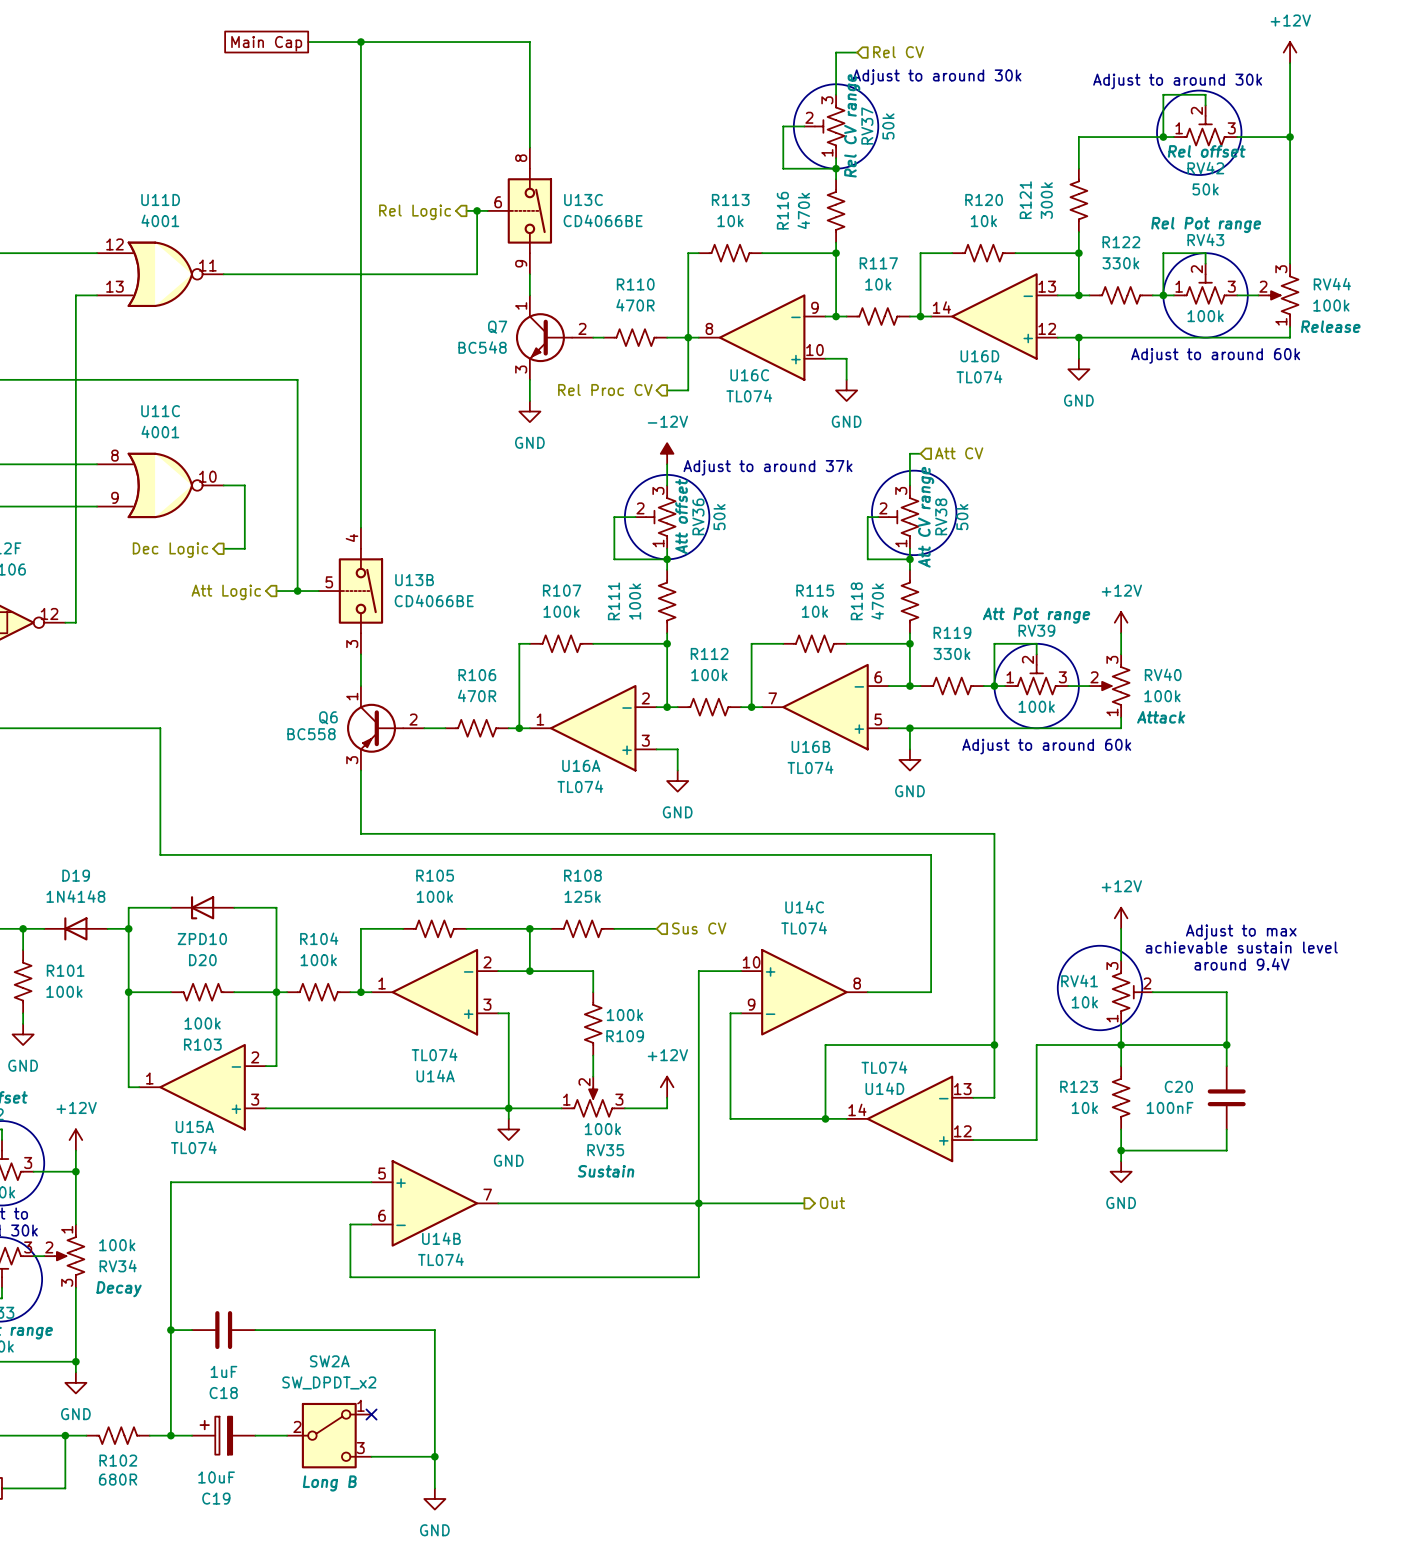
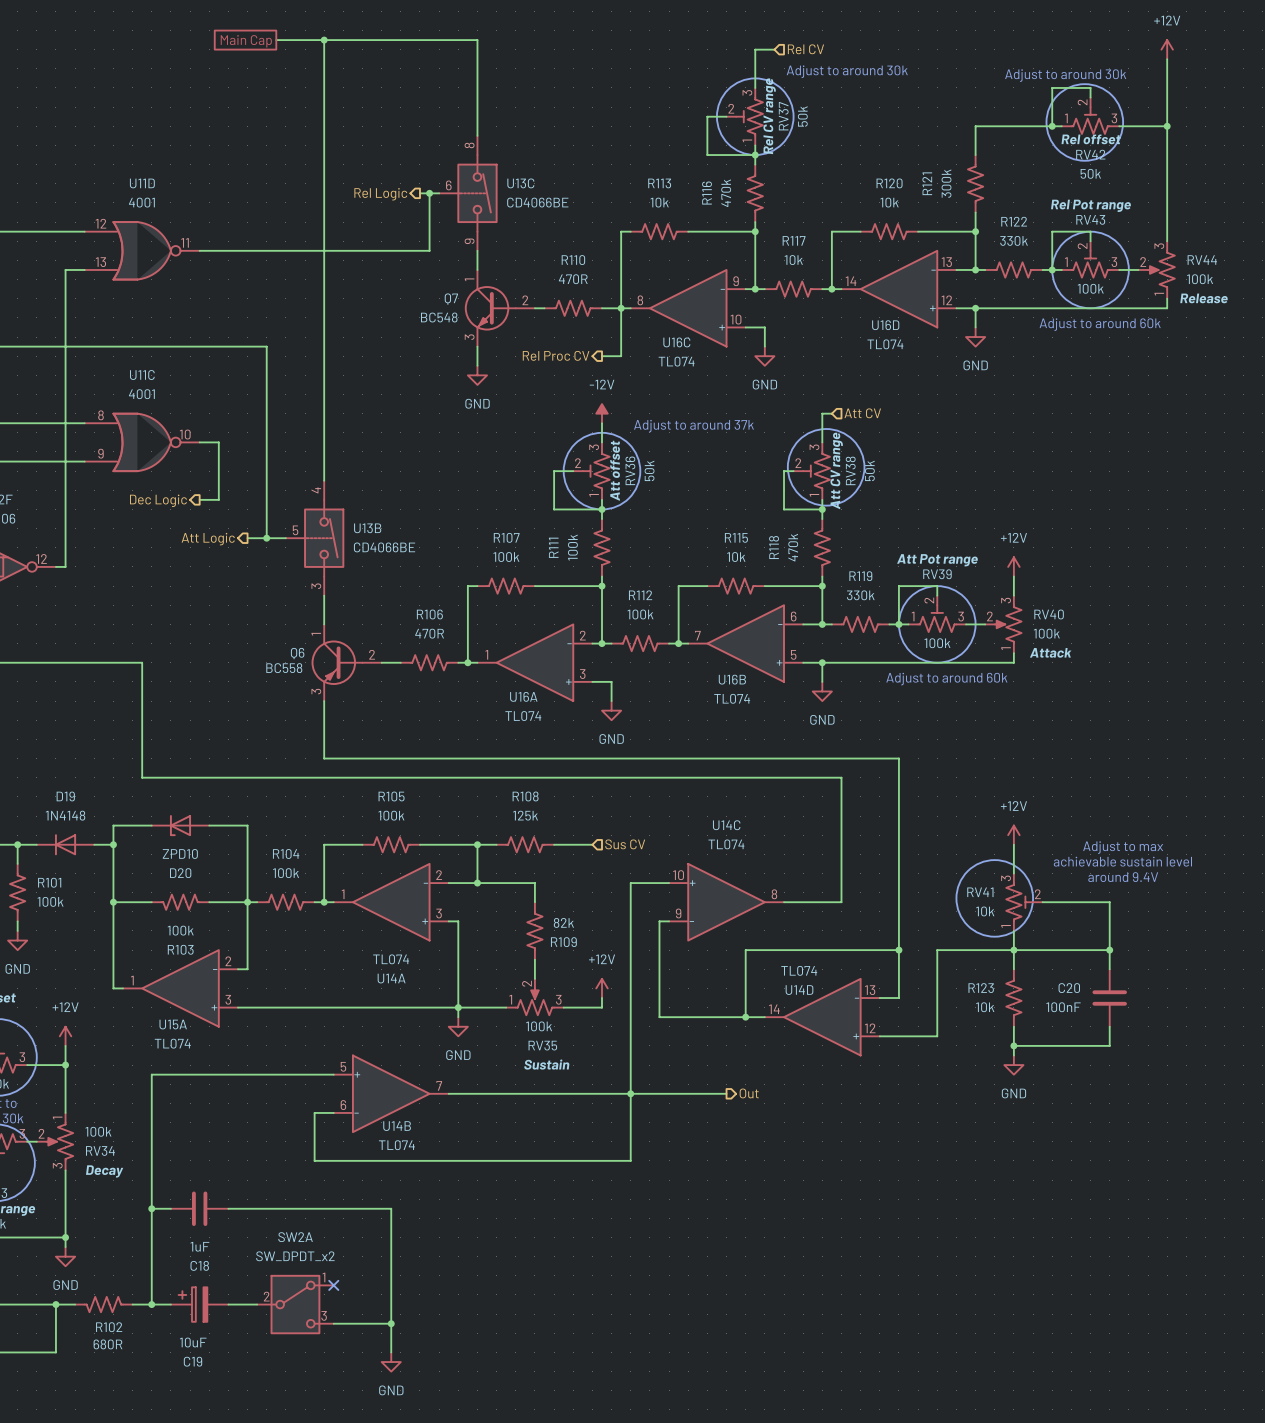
R109 value: 100k (624, 1015) -> 82k (563, 922)
SW2A text: Long B (329, 1483) -> none

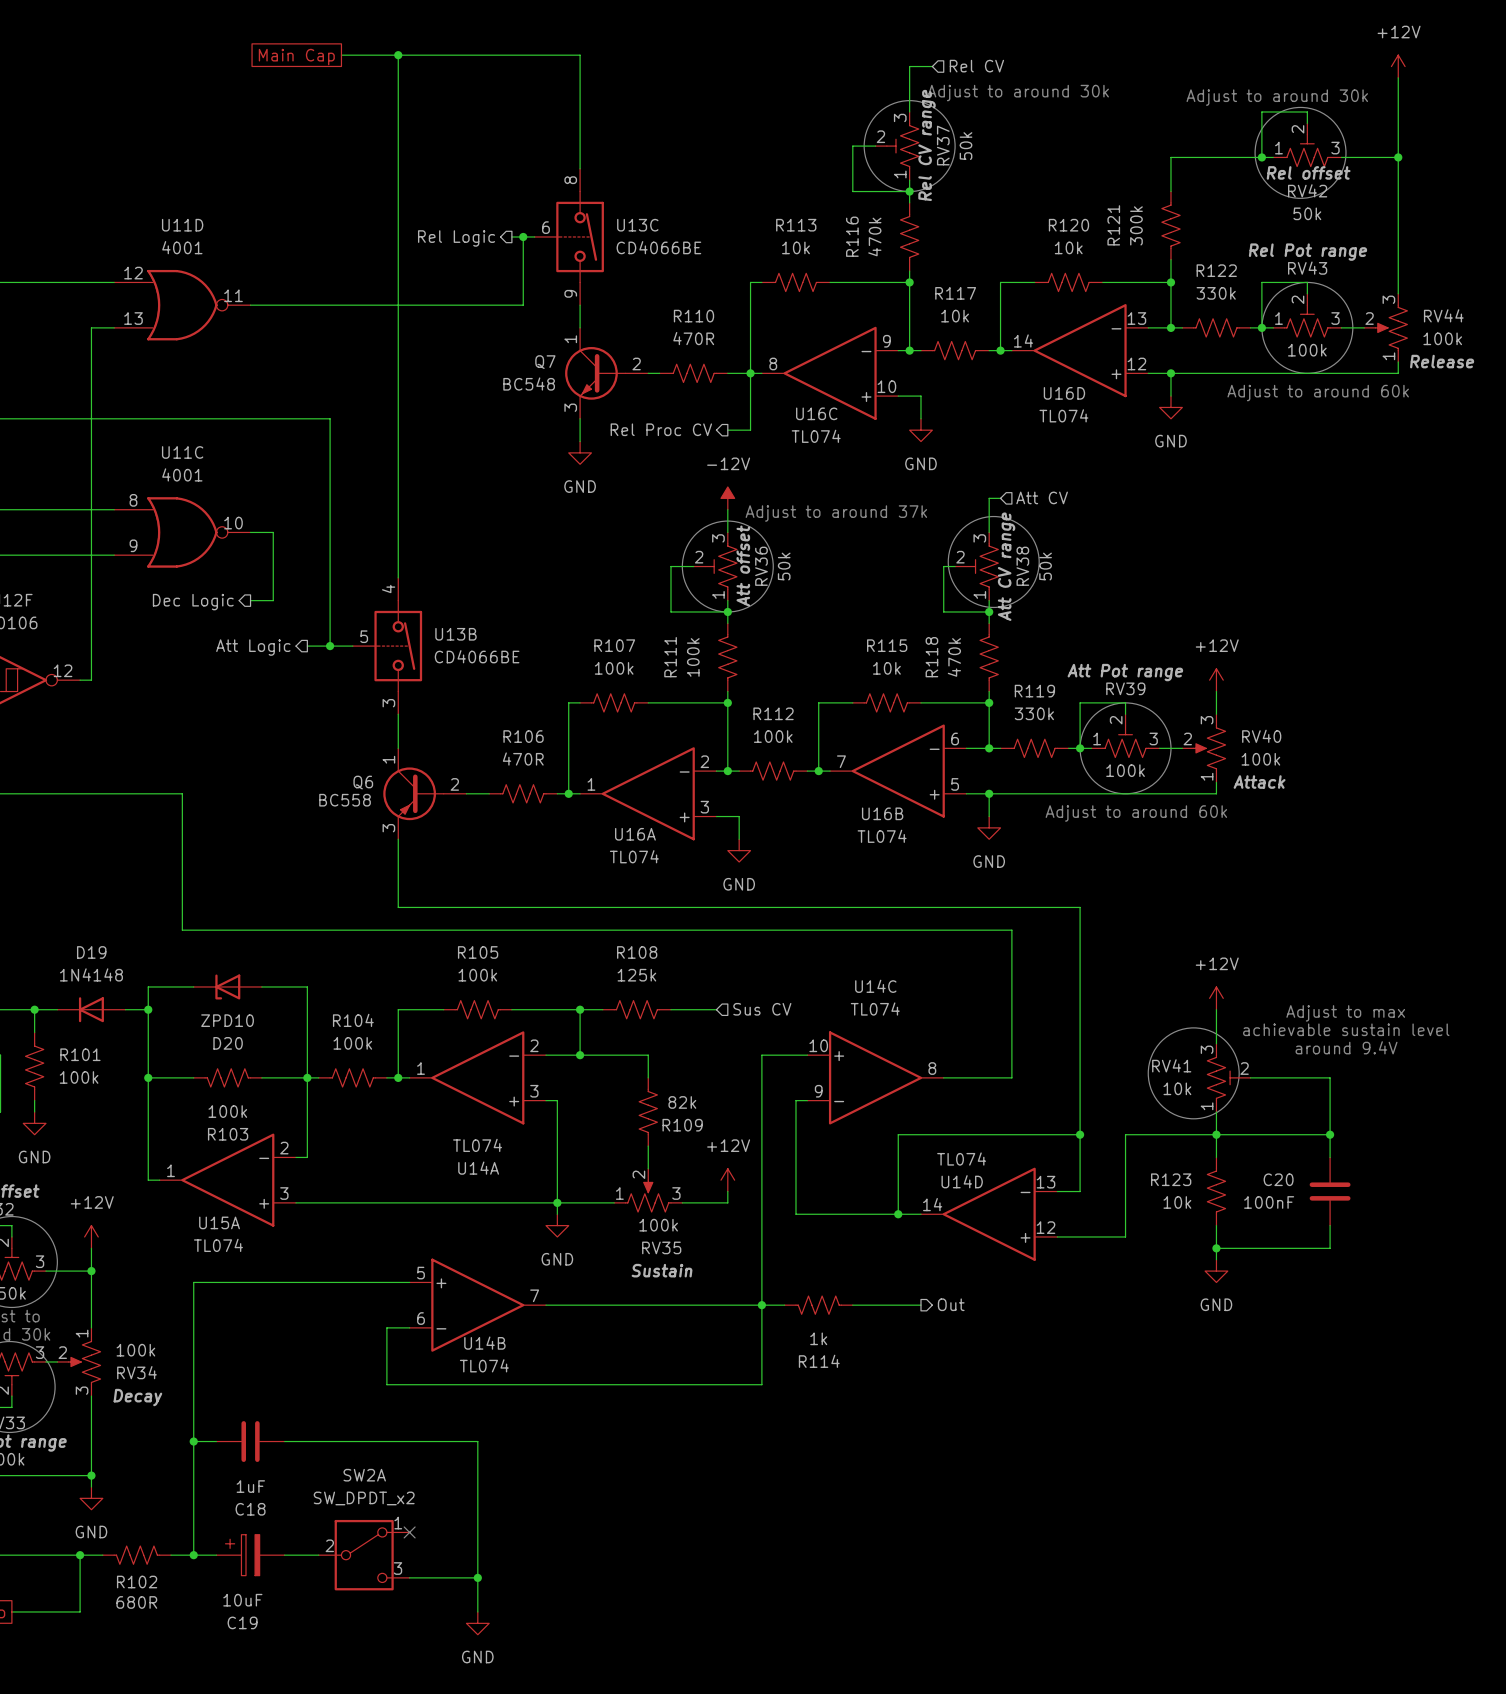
R114: none -> 1k (818, 1305)
wire: none -> (875, 1305) (920, 1305)
hierarchical label position: Out (749, 1093) -> Out (951, 1304)

